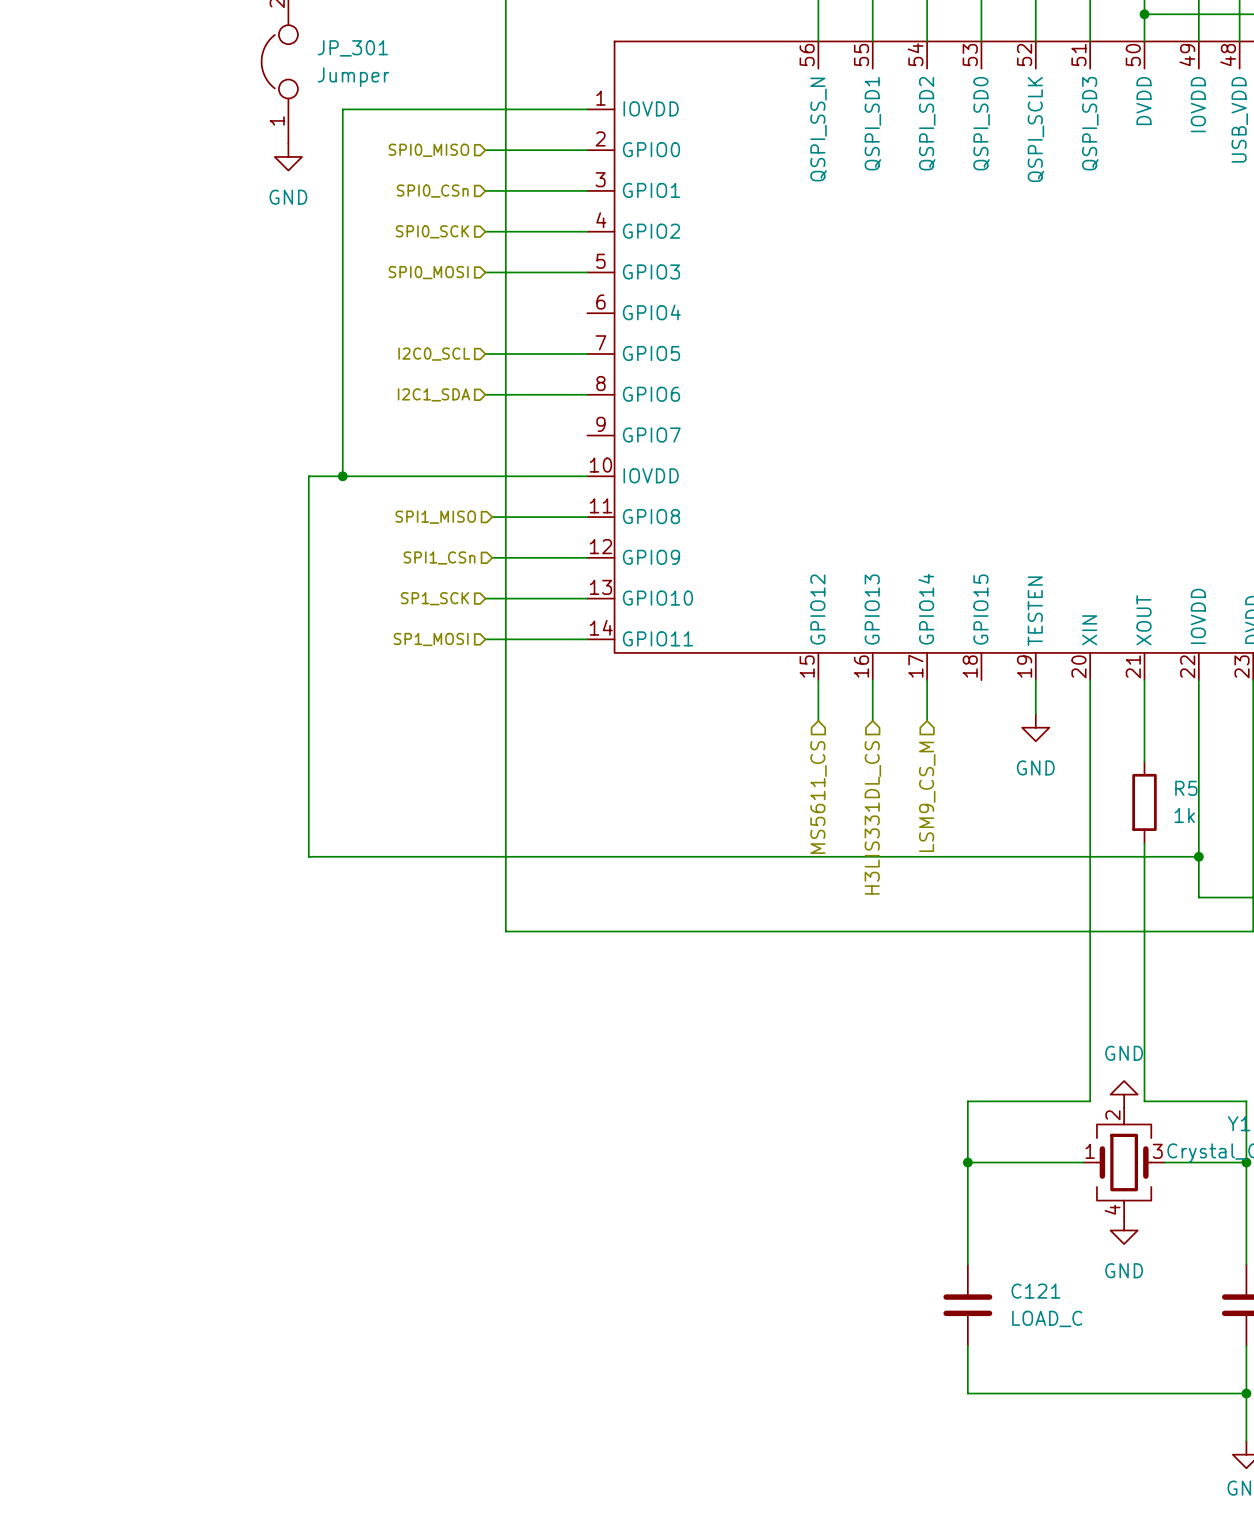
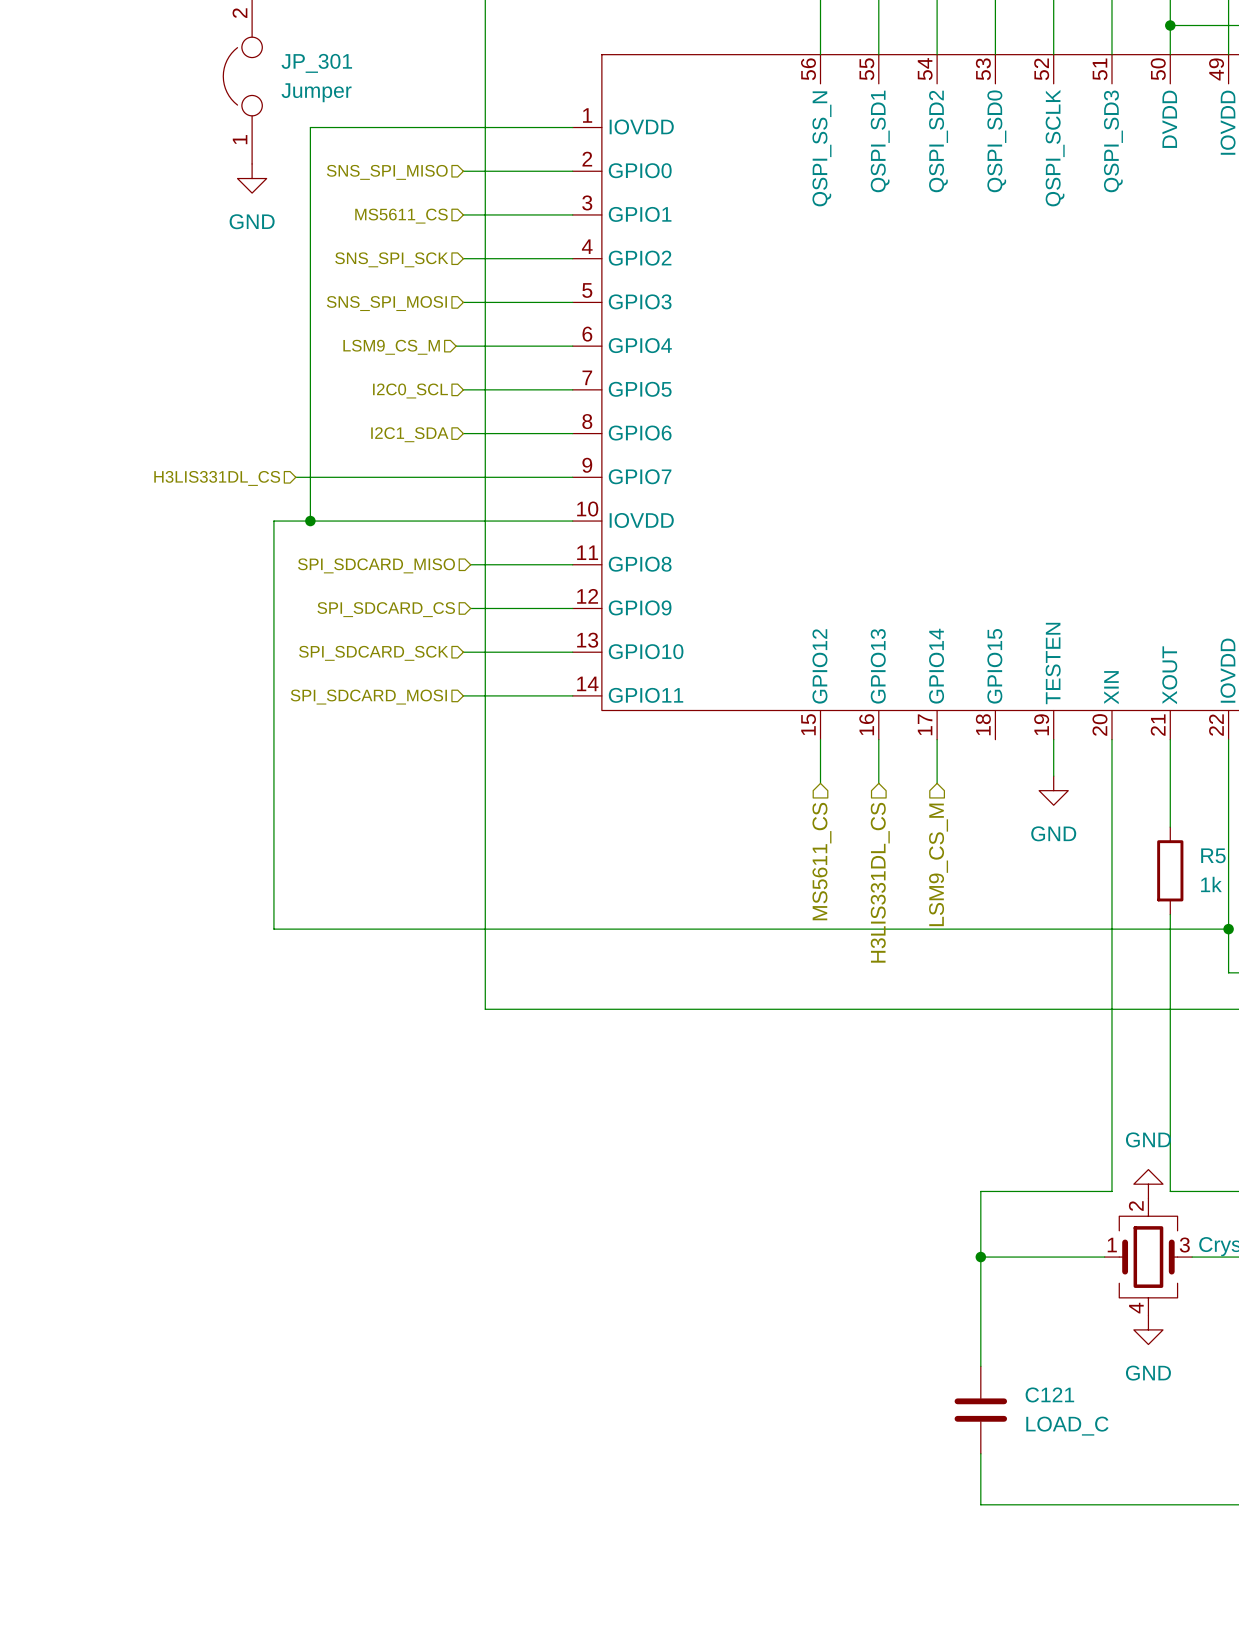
hierarchical label: SPI0_MISO (428, 150) -> SNS_SPI_MISO (387, 172)
hierarchical label: SPI0_CSn (432, 191) -> MS5611_CS (401, 216)
hierarchical label: SPI0_SCK (432, 231) -> SNS_SPI_SCK (391, 259)
hierarchical label: SPI0_MOSI (428, 272) -> SNS_SPI_MOSI (386, 303)
hierarchical label: none -> LSM9_CS_M (391, 347)
wire: none -> (456, 346) (572, 346)
hierarchical label: none -> H3LIS331DL_CS (217, 478)
wire: none -> (295, 477) (572, 477)
hierarchical label: SPI1_MISO (435, 517) -> SPI_SDCARD_MISO (376, 565)
hierarchical label: SPI1_CSn (439, 557) -> SPI_SDCARD_CS (386, 609)
hierarchical label: SP1_SCK (435, 598) -> SPI_SDCARD_SCK (373, 653)
hierarchical label: SP1_MOSI (431, 639) -> SPI_SDCARD_MOSI (368, 697)

